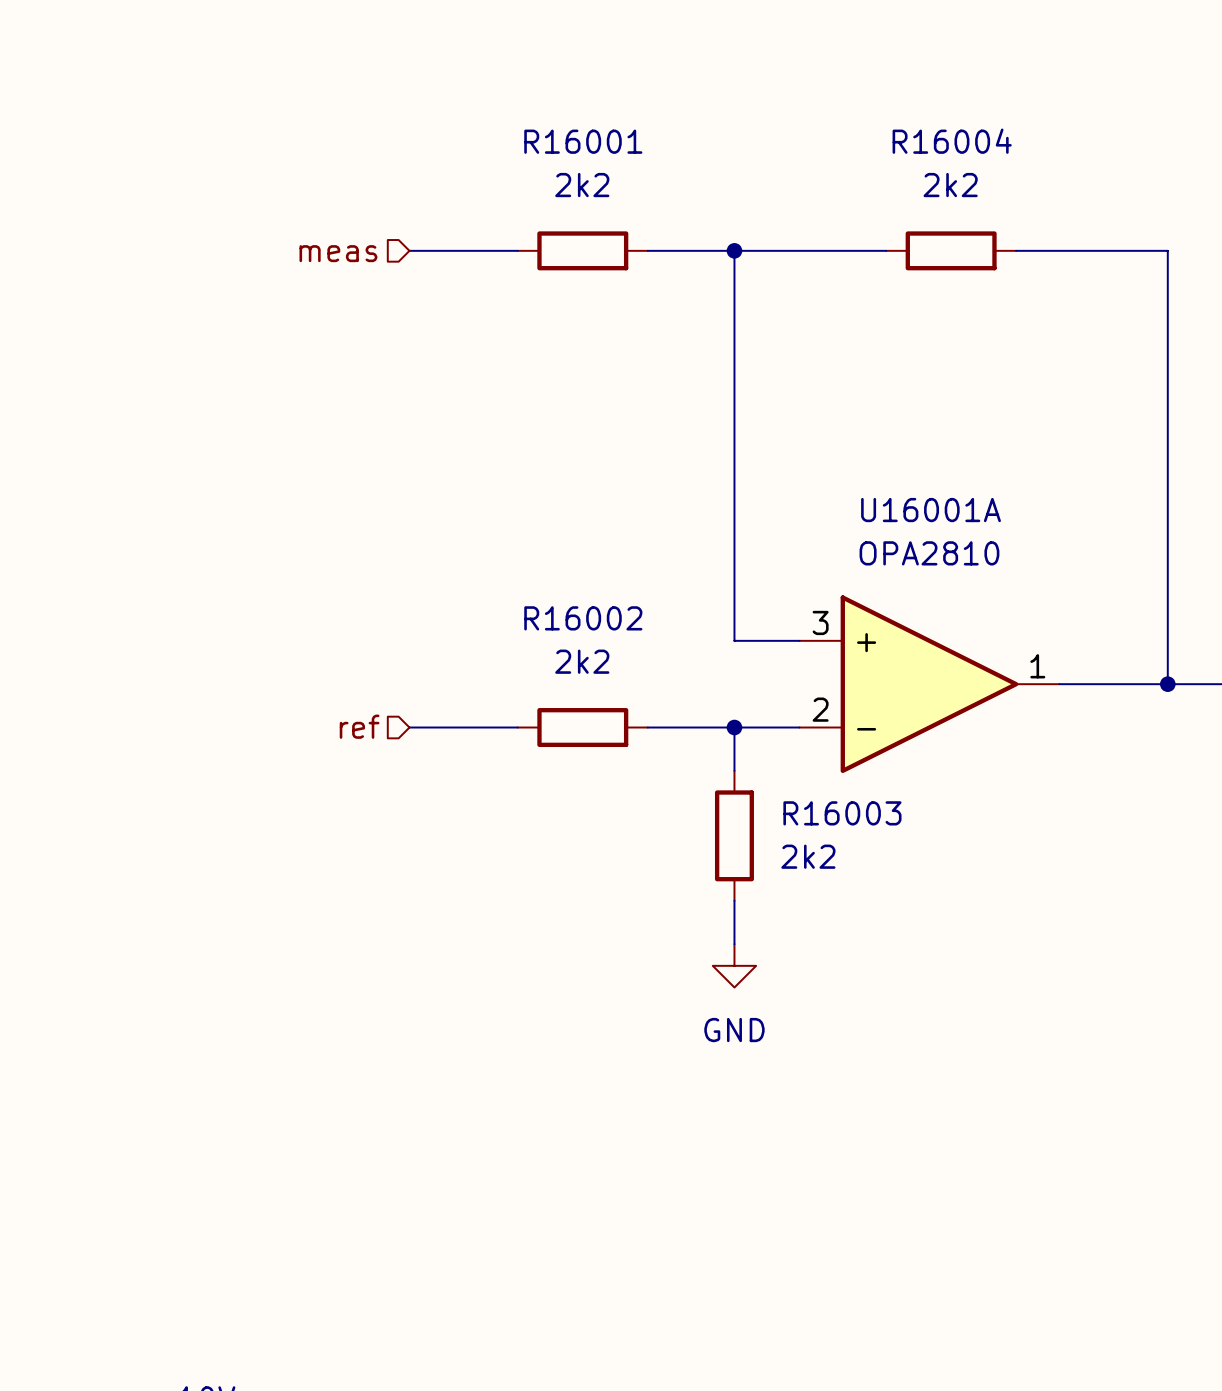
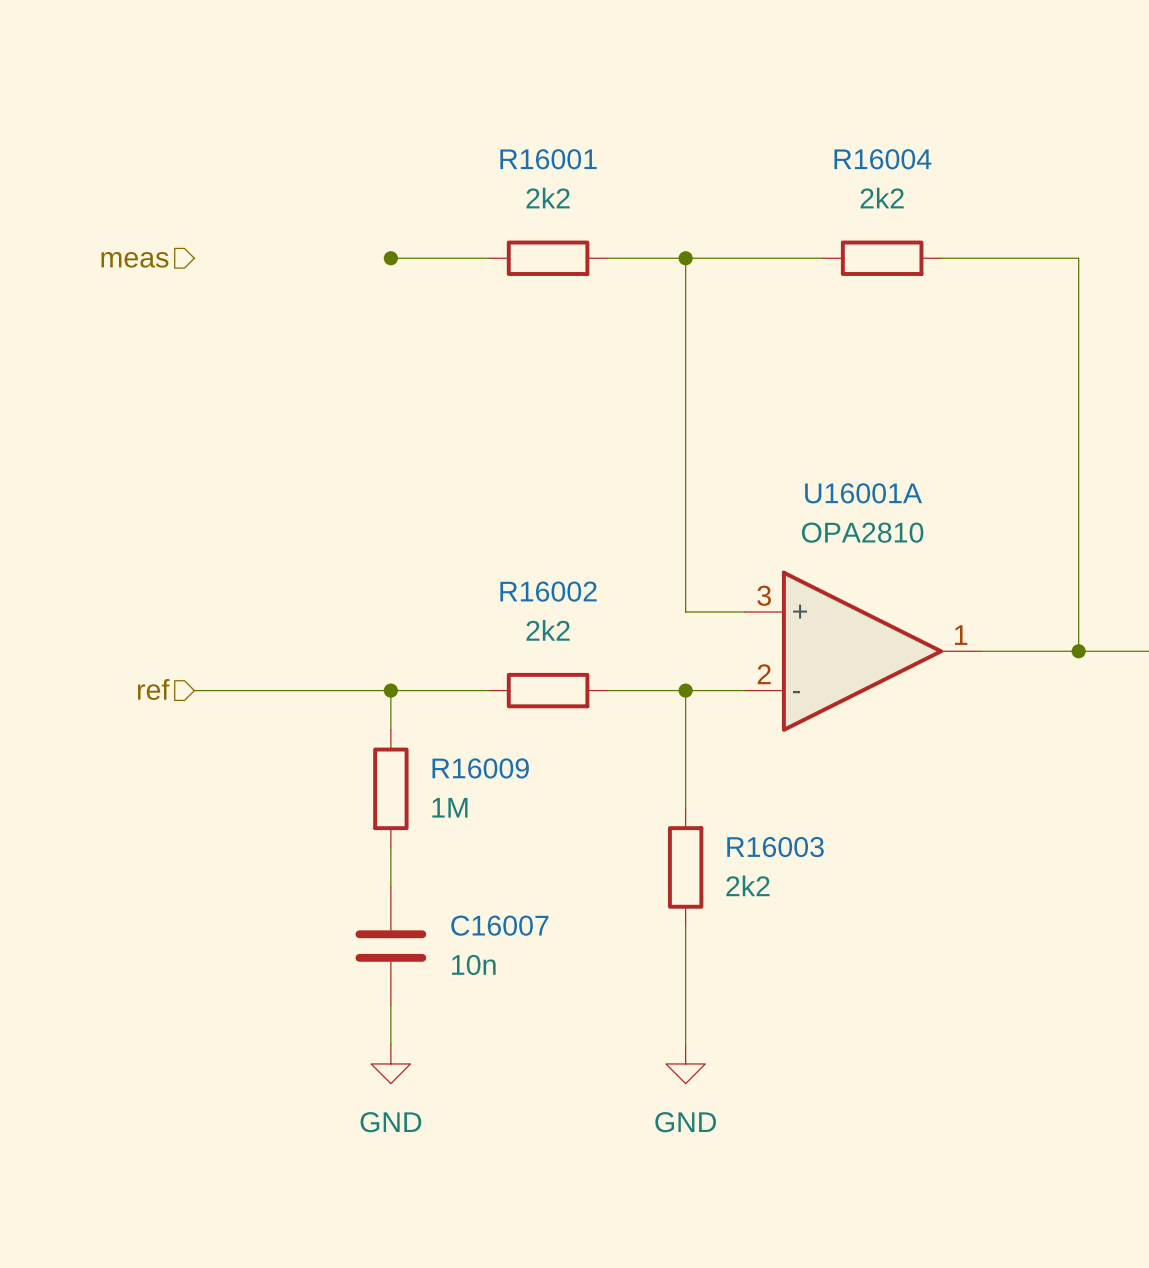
junction: none -> (390, 258)
hierarchical label position: meas (338, 253) -> meas (134, 259)
hierarchical label position: ref (359, 726) -> ref (153, 689)
wire: none -> (194, 690) (390, 690) (390, 729)
junction: none -> (390, 690)
wire: none -> (685, 729) (685, 808)
R16009: none -> 1M (390, 788)
R16003 position: (734, 835) -> (685, 867)
wire: (734, 900) (734, 944) -> (390, 847) (390, 887)
power symbol position: GND (734, 965) -> GND (685, 1063)
wire: none -> (685, 926) (685, 1044)
C16007: none -> 10n (390, 946)
wire: none -> (390, 1005) (390, 1044)
power symbol: none -> GND (390, 1063)

